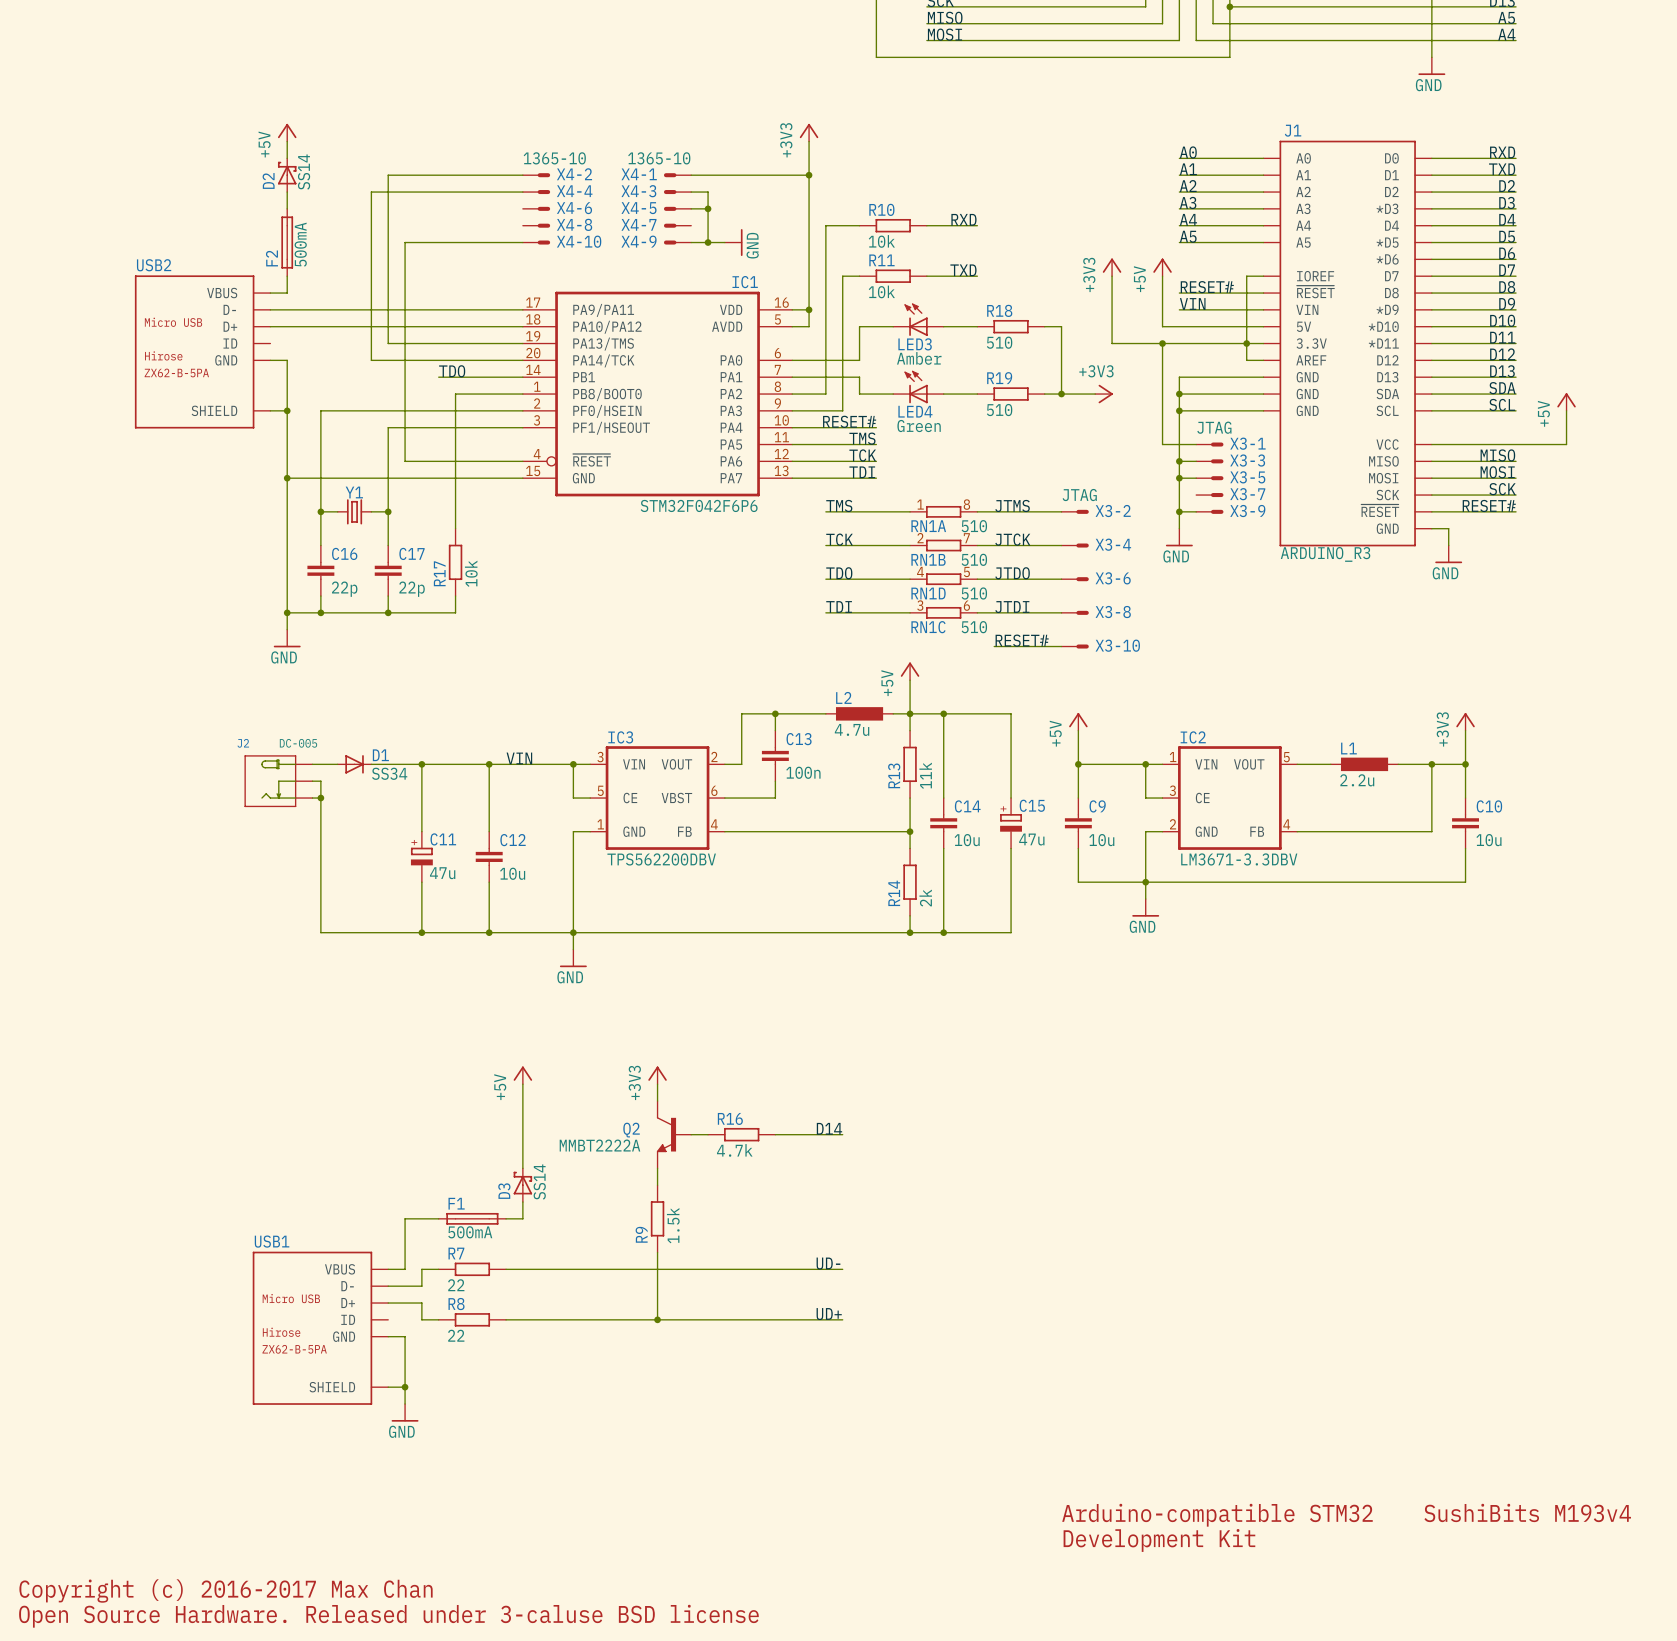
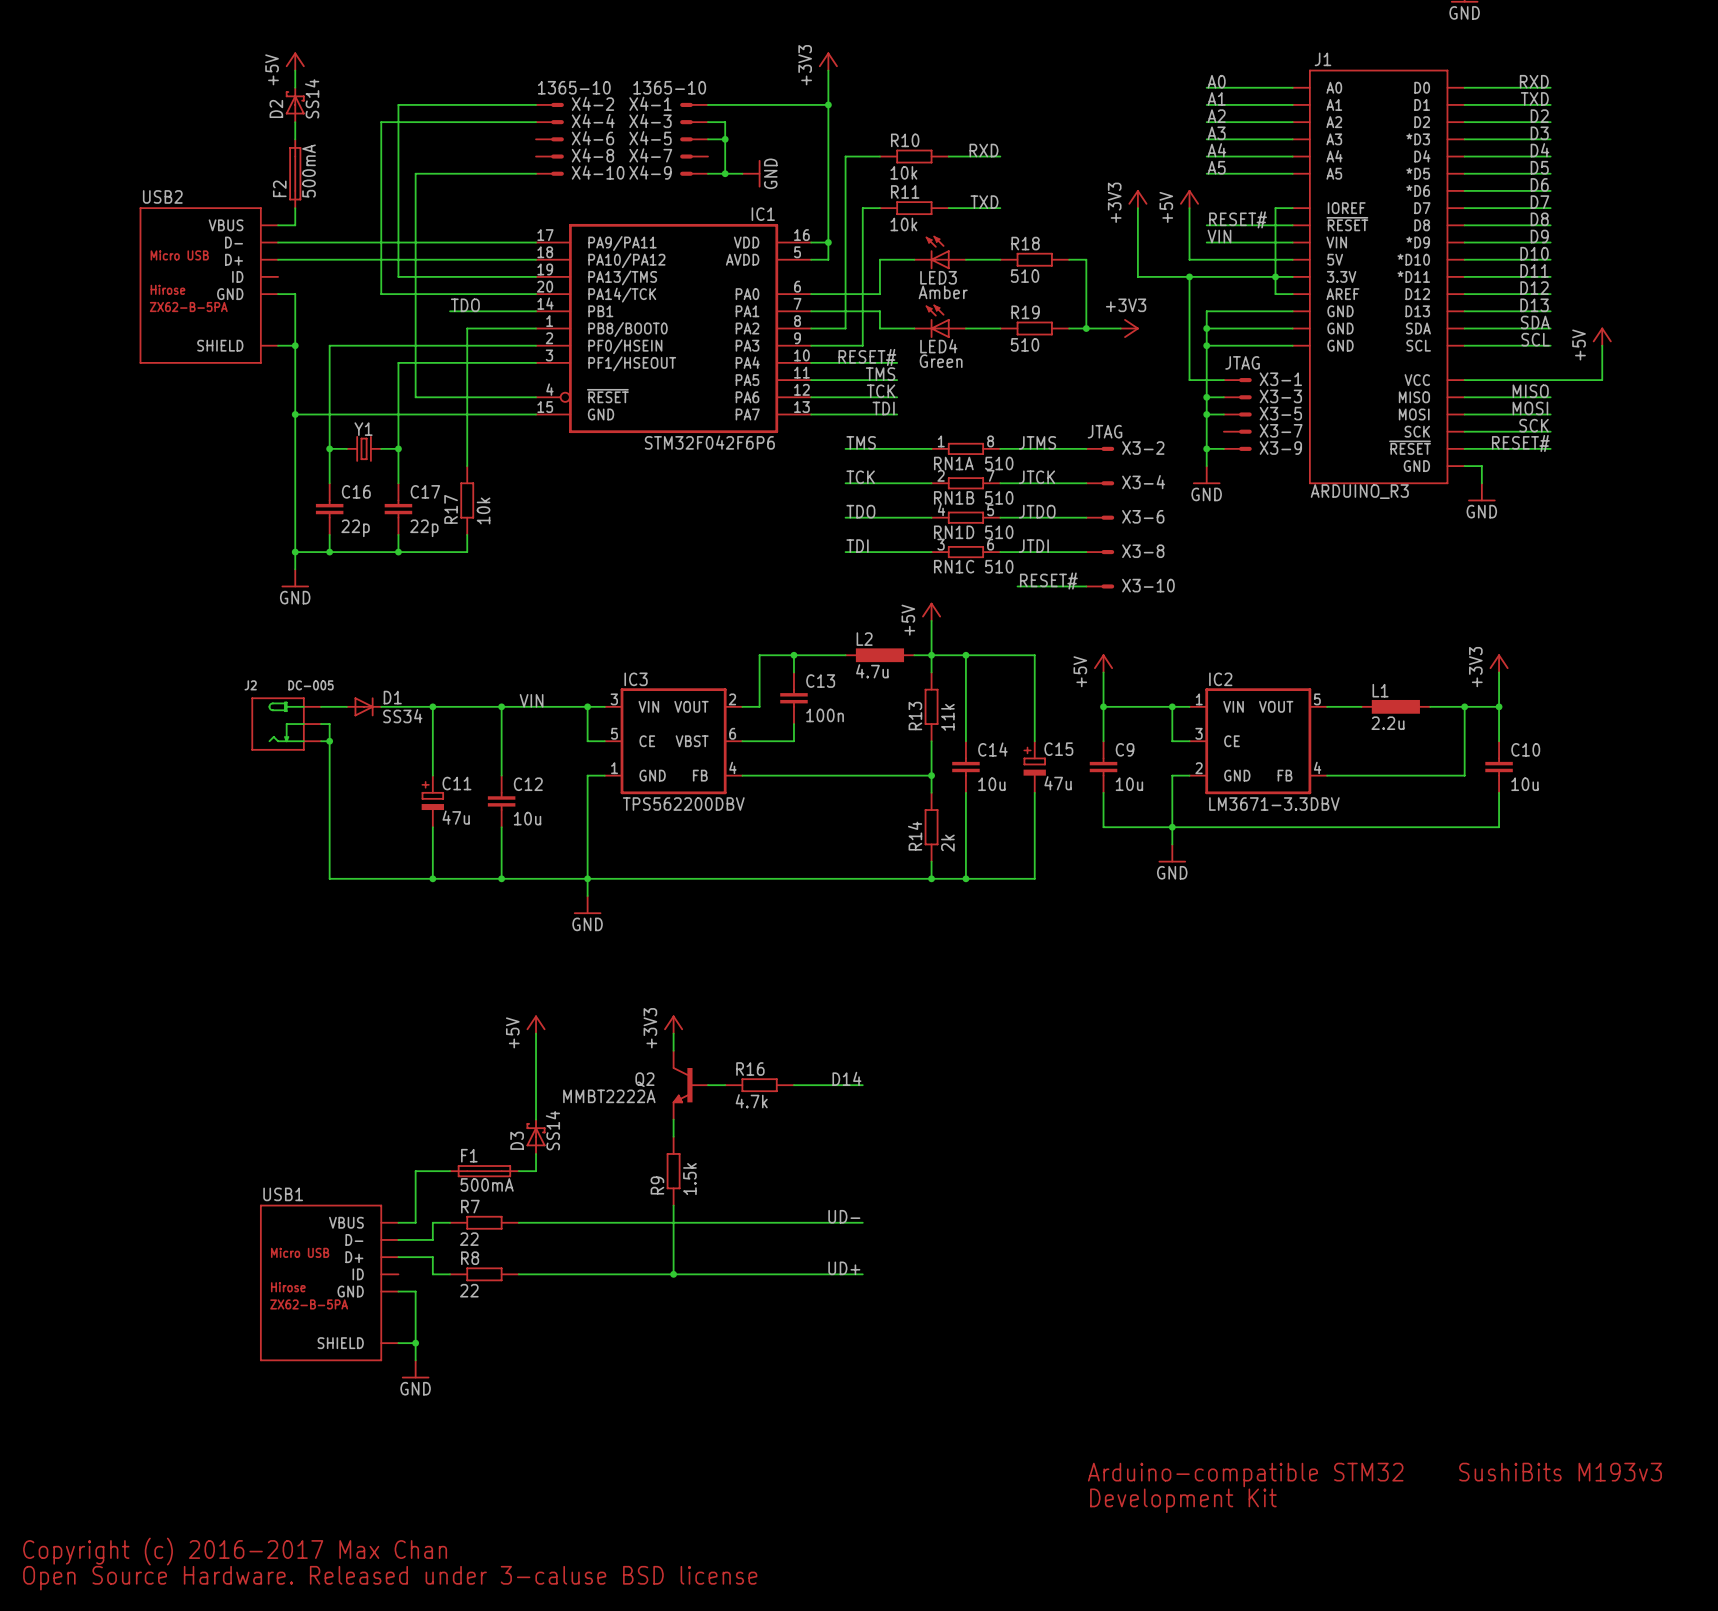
text: SushiBits M193v4 (1527, 1512) -> SushiBits M193v3 (1560, 1472)

